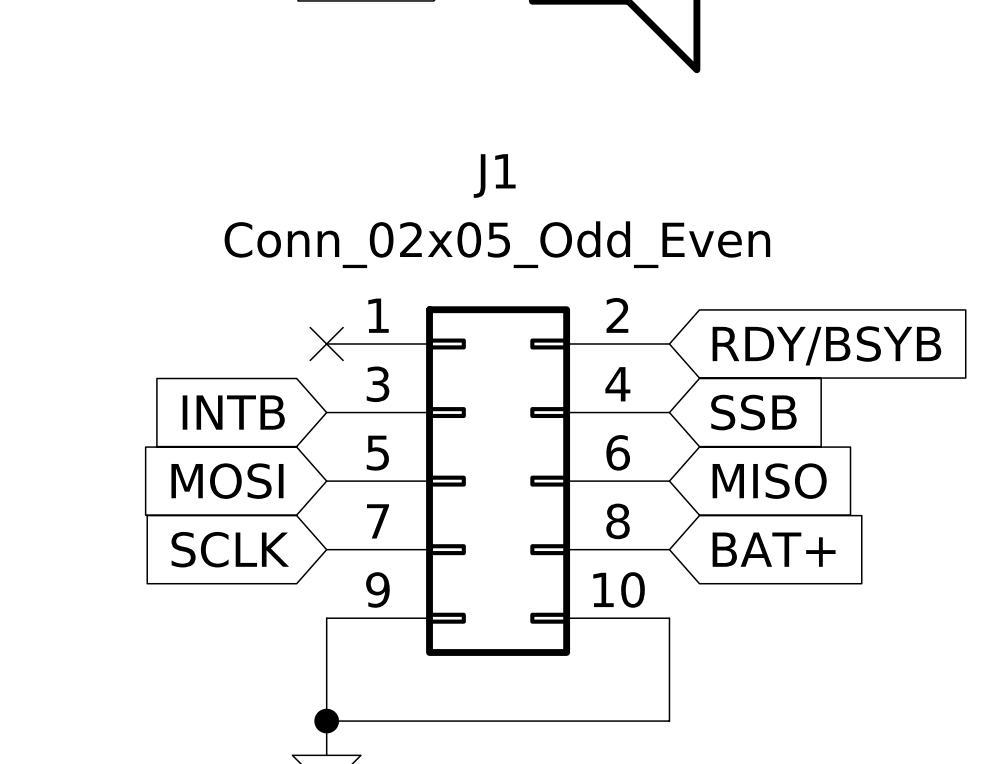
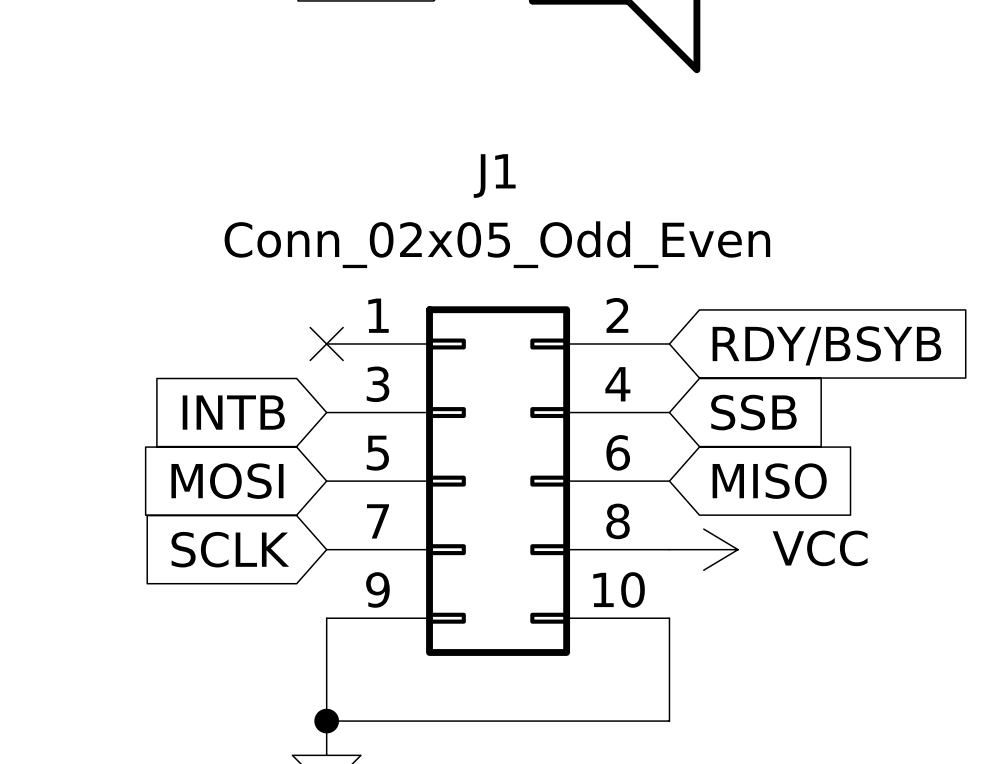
power symbol: none -> VCC (703, 549)
global label: BAT+ (774, 549) -> none

